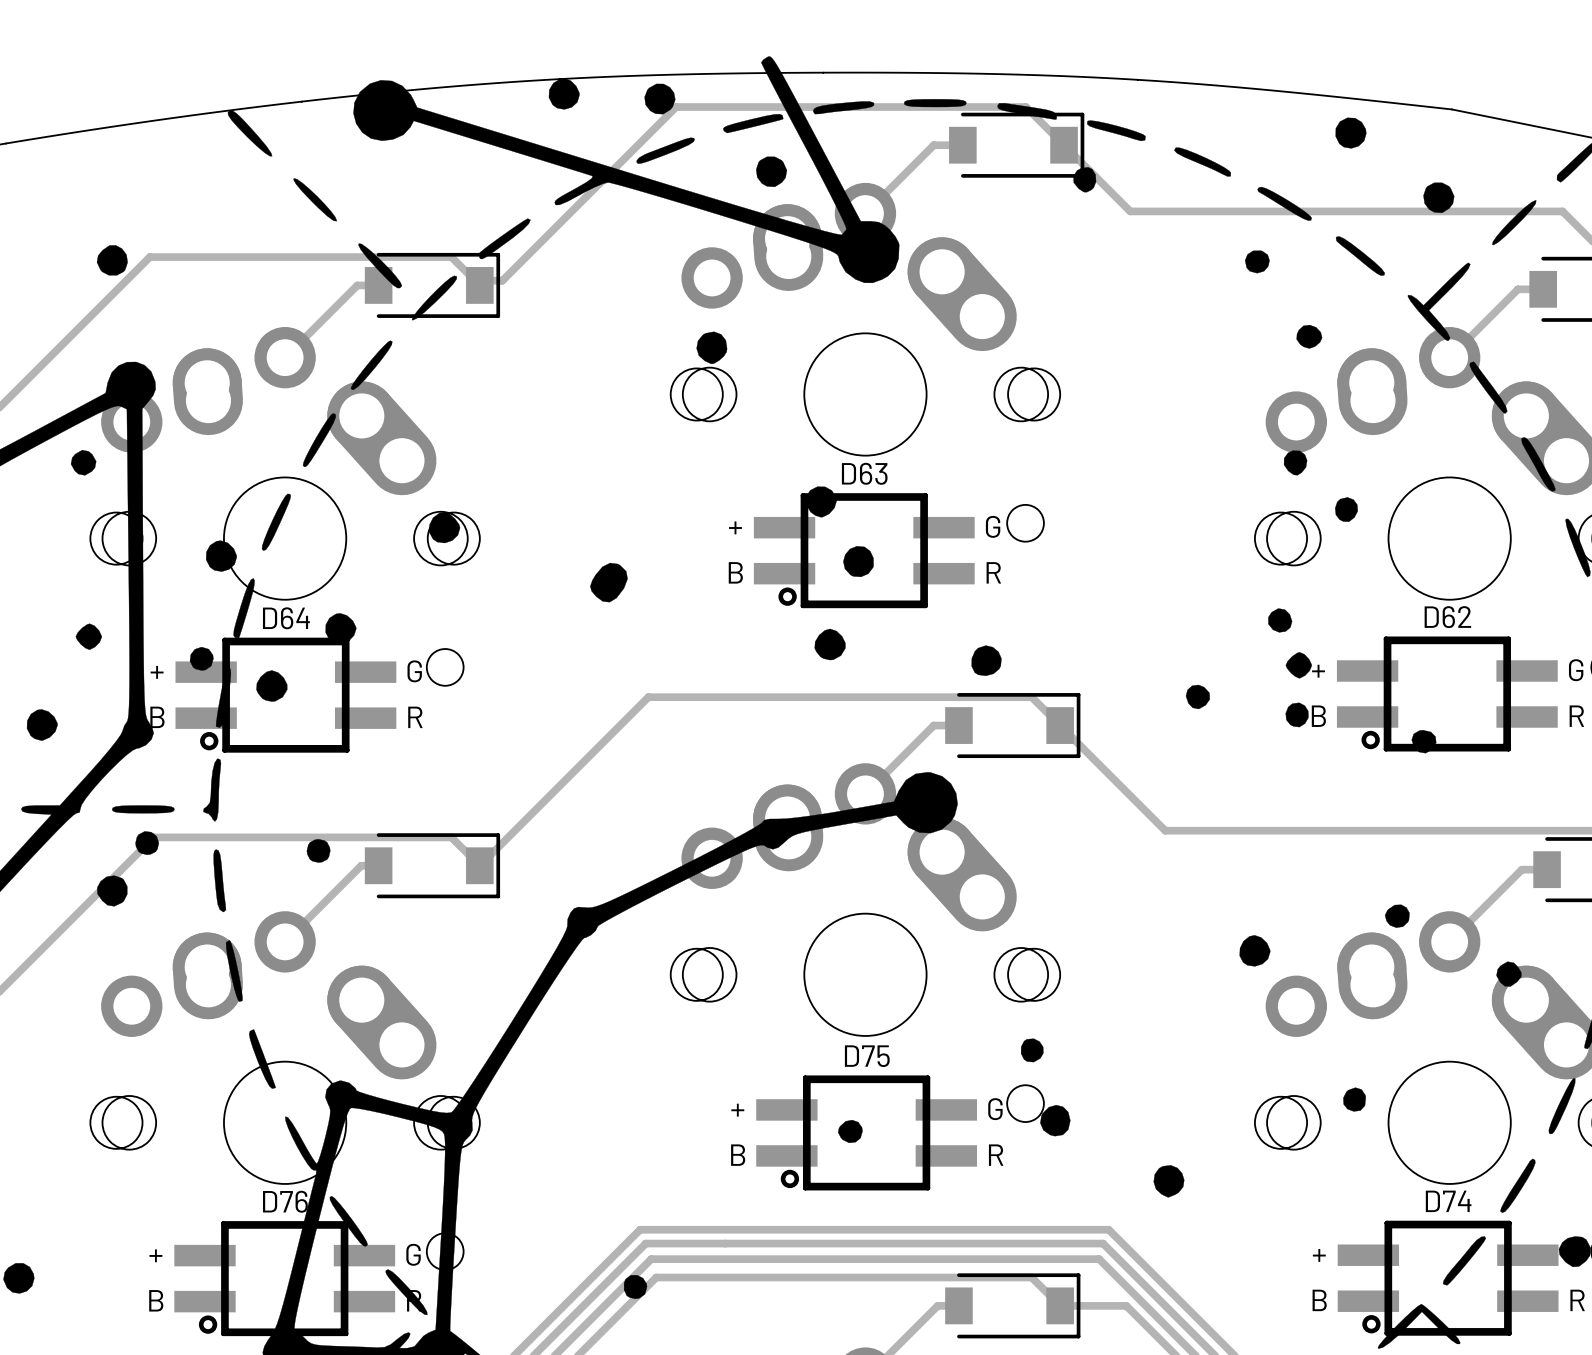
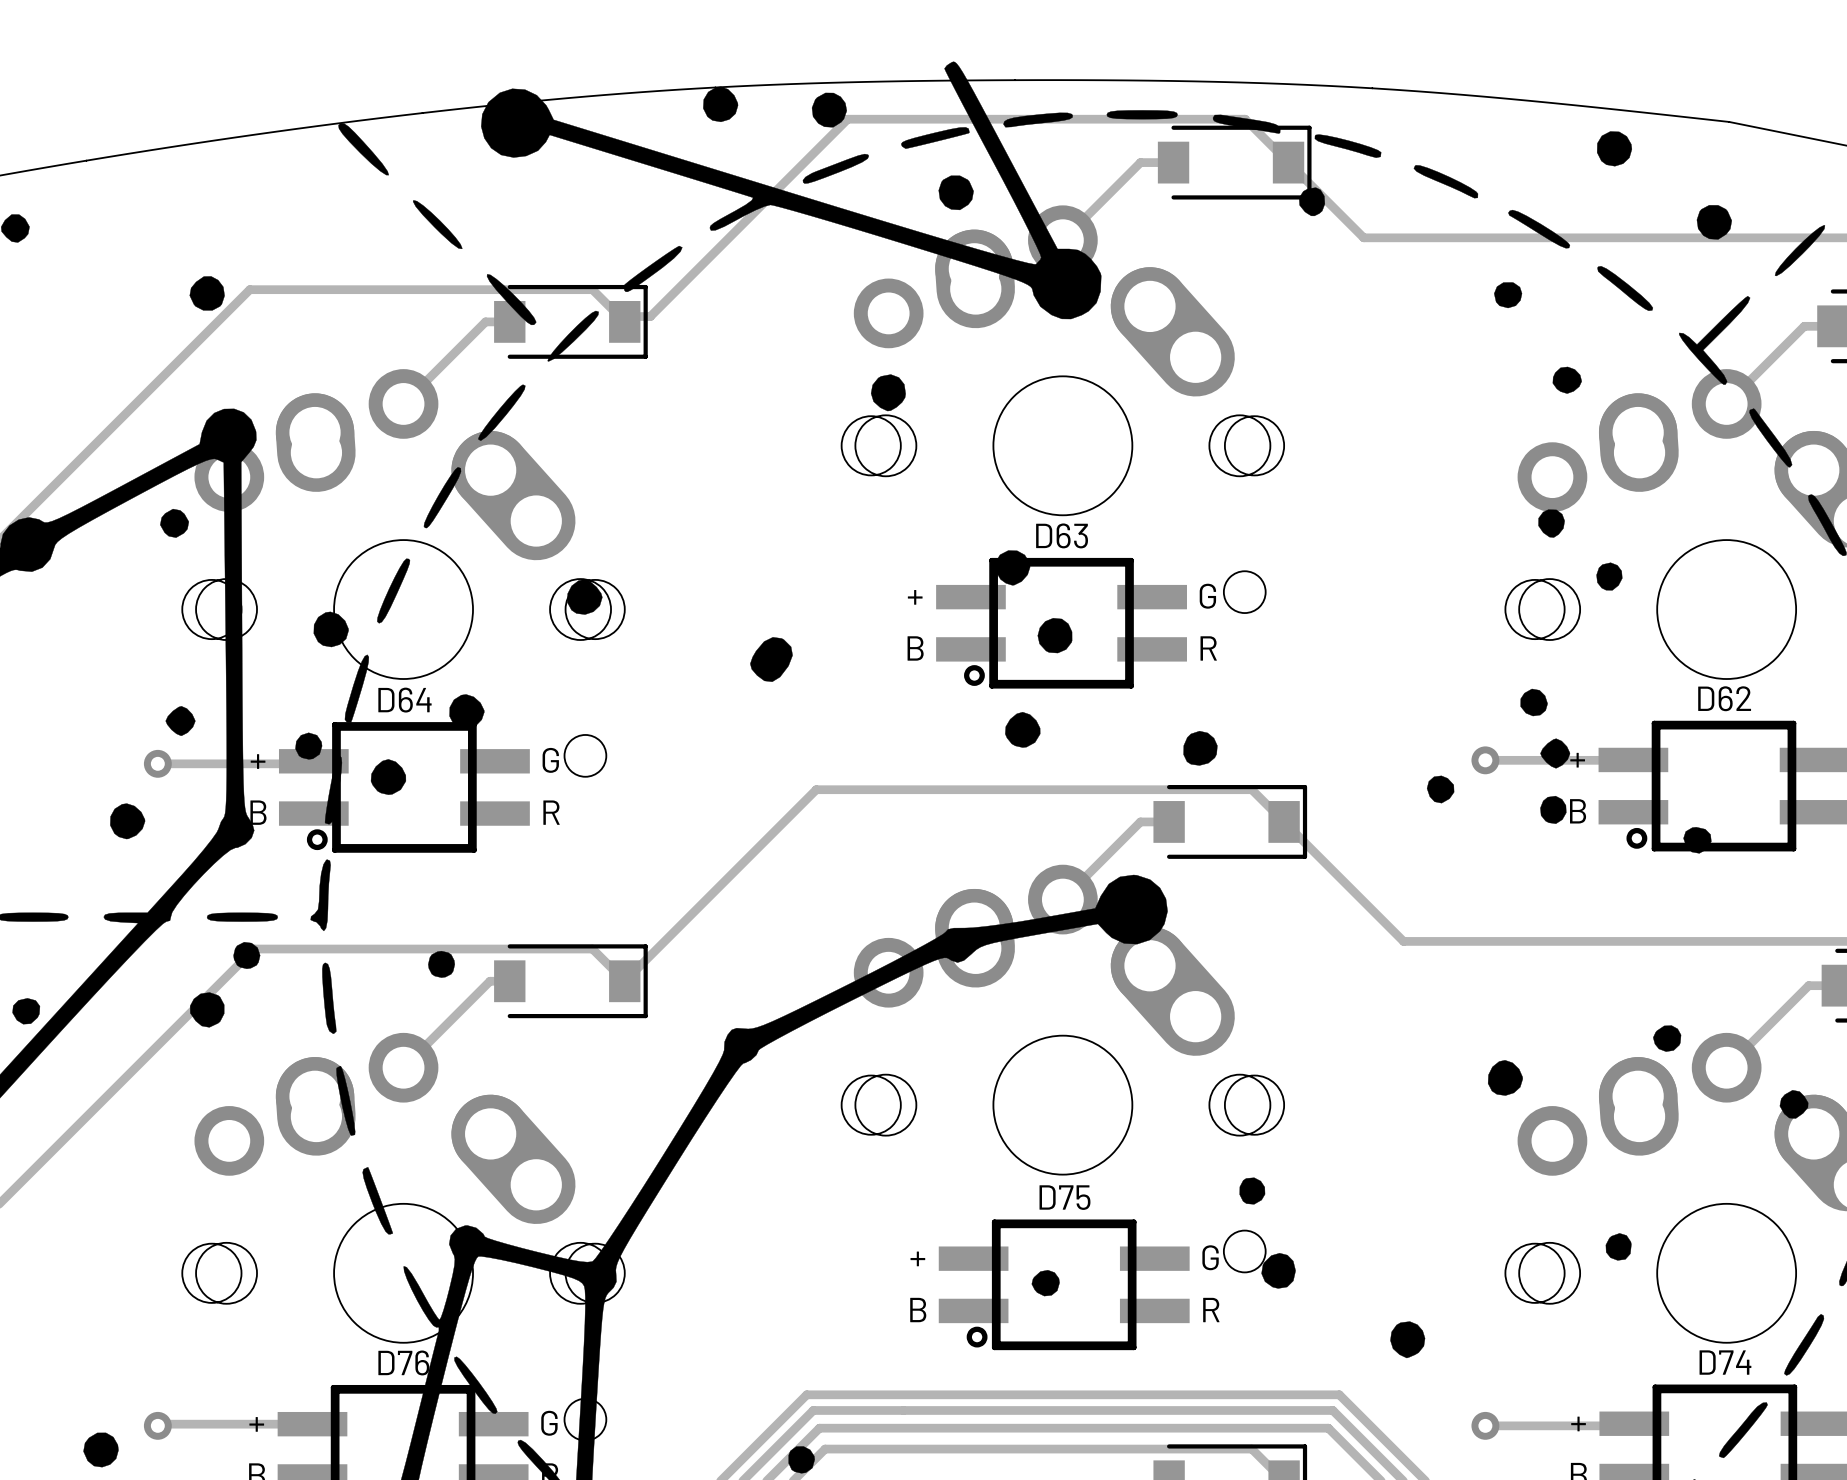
via: none -> (1485, 760)
track: none -> (1633, 760) (1485, 760)
track: none -> (313, 761) (311, 763) (157, 763)
via: none -> (157, 763)
track: none -> (312, 1424) (159, 1424) (157, 1425)
track: none -> (1634, 1423) (1623, 1423) (1621, 1425) (1485, 1425)
via: none -> (157, 1425)
via: none -> (1485, 1425)

